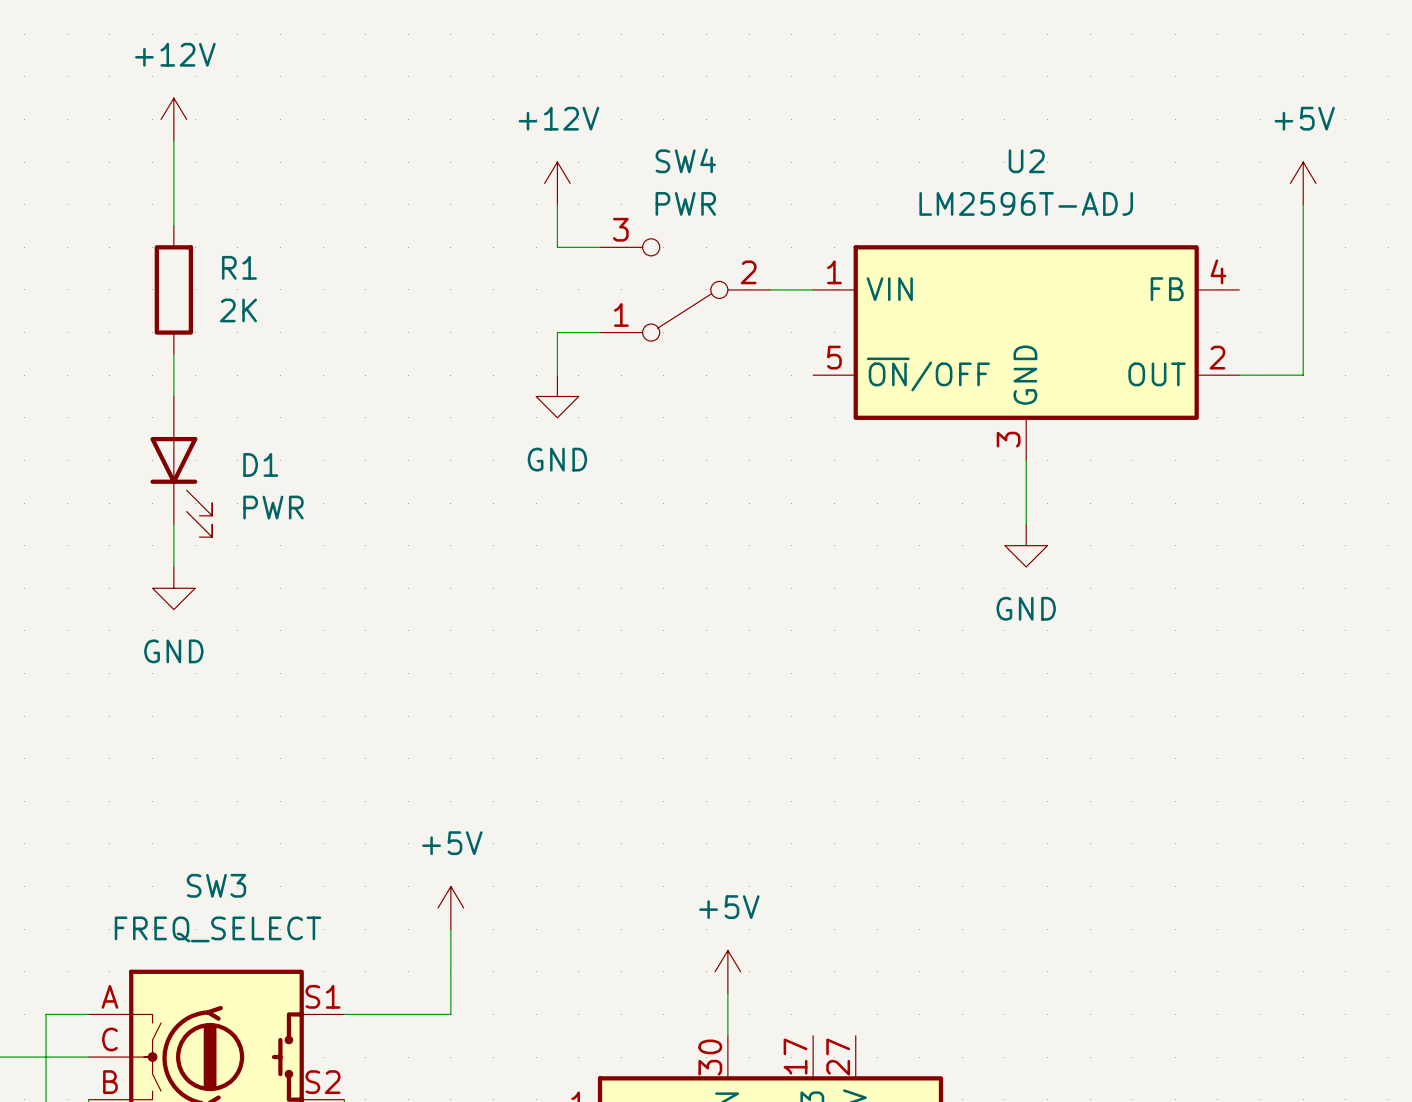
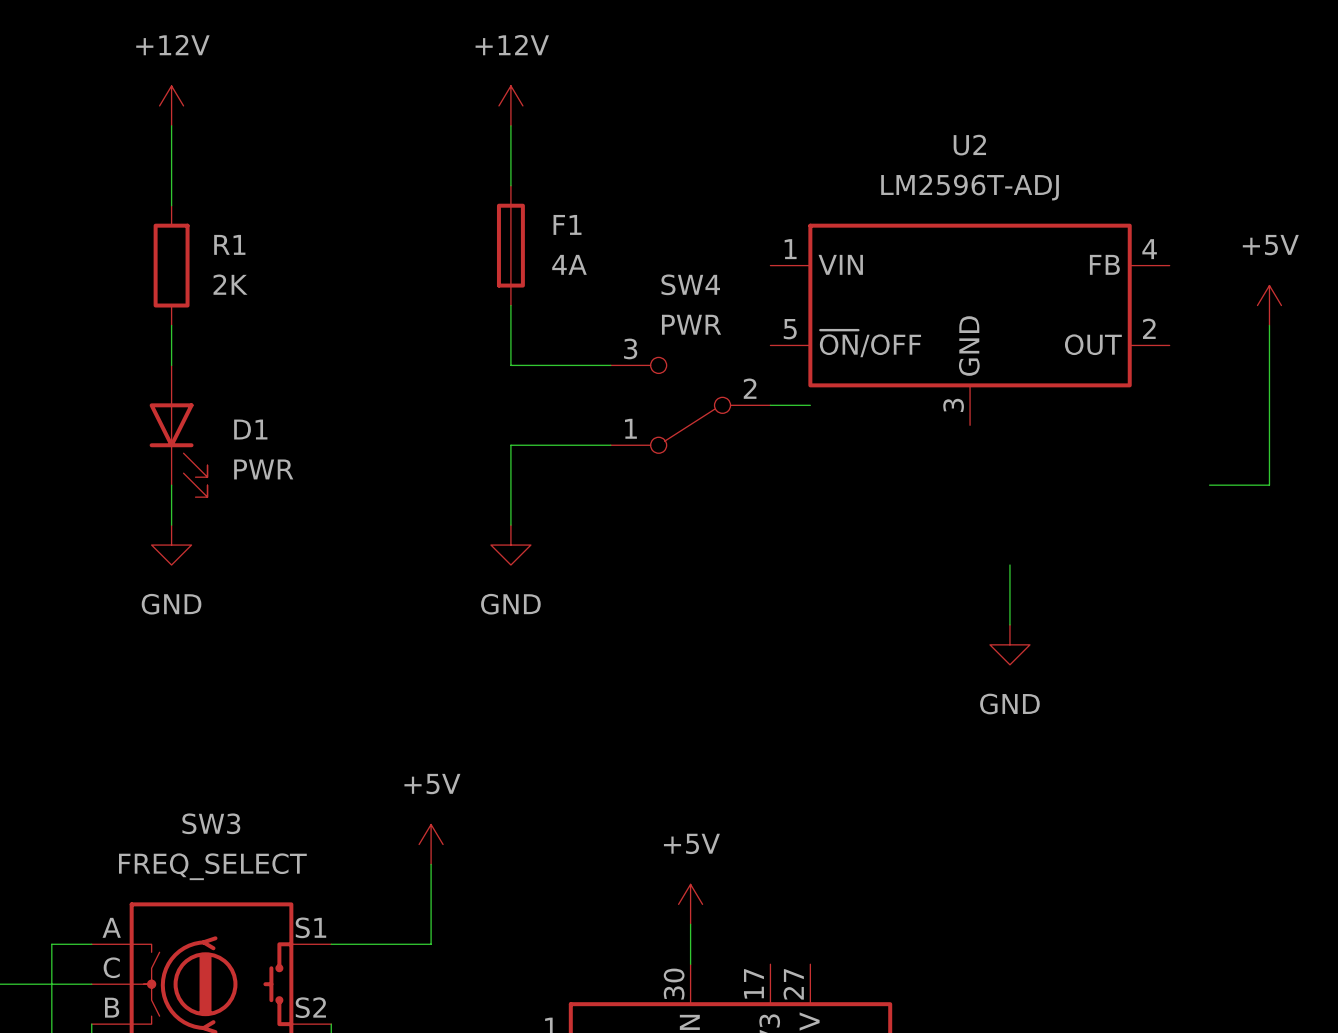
wire: none -> (510, 125) (510, 185)
power symbol position: +12V (557, 183) -> +12V (510, 105)
power symbol position: +5V (1303, 183) -> +5V (1269, 305)
wire: (557, 204) (557, 247) (600, 247) -> none
wire: (1303, 204) (1303, 375) (1239, 375) -> (1269, 325) (1269, 485) (1209, 485)
F1: none -> 4A (510, 245)
SW4 position: (685, 289) -> (690, 405)
wire: (770, 289) (813, 289) -> (770, 405) (810, 405)
wire: none -> (510, 305) (510, 365) (610, 365)
wire: (600, 332) (557, 332) (557, 375) -> none
power symbol position: GND (557, 396) -> GND (510, 545)
wire: (1026, 460) (1026, 524) -> (1009, 565) (1009, 624)
wire: none -> (610, 445) (510, 445) (510, 525)
power symbol position: GND (1026, 545) -> GND (1009, 644)

